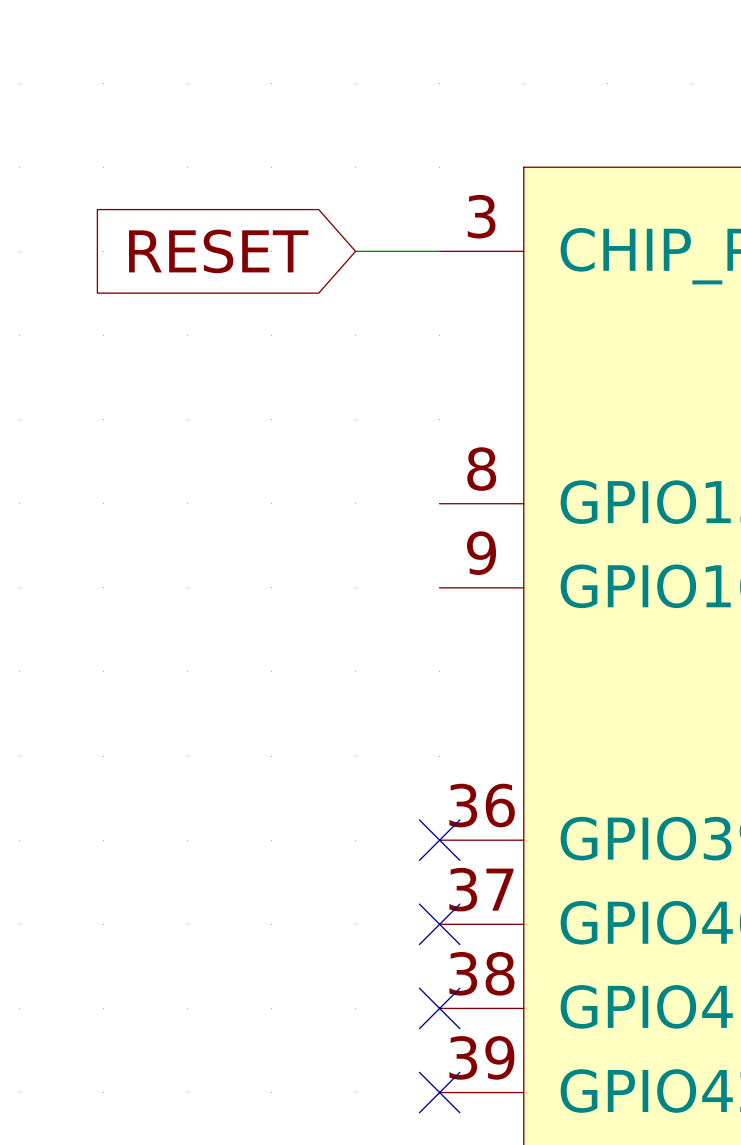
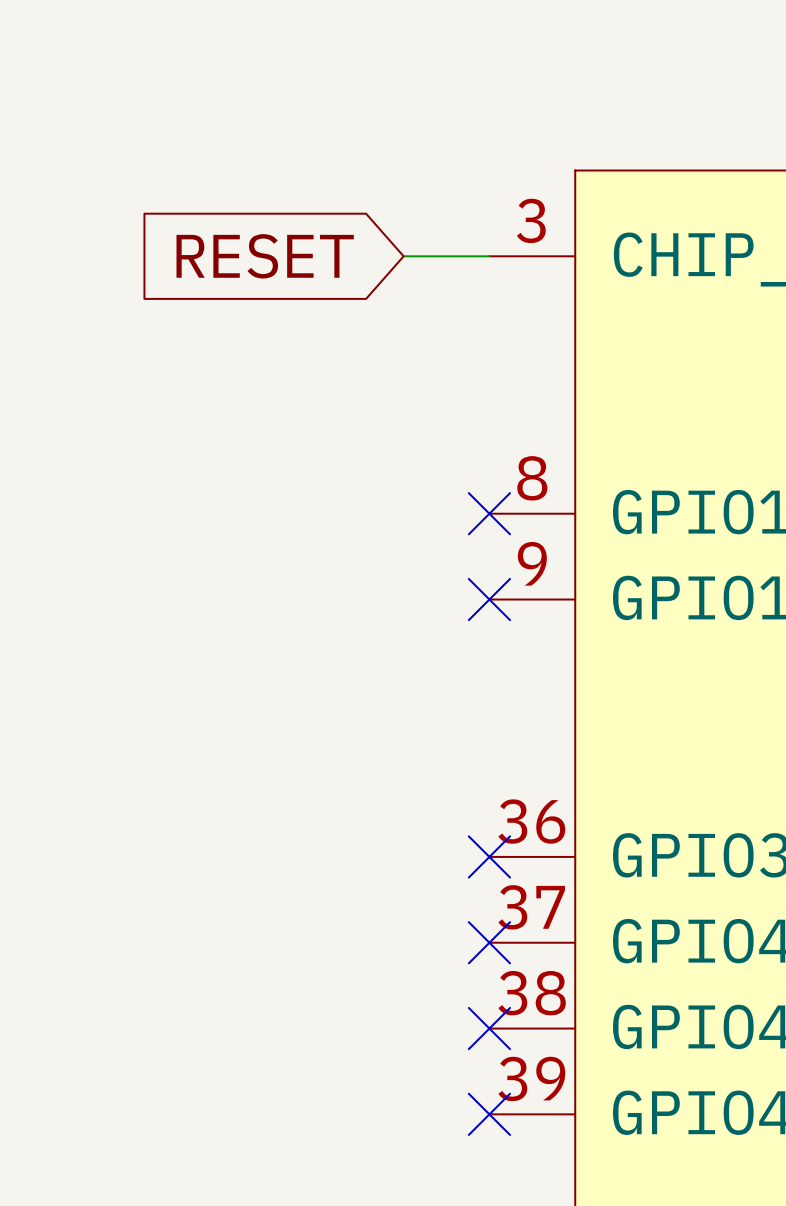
no-connect mark: none -> (489, 513)
no-connect mark: none -> (489, 599)

